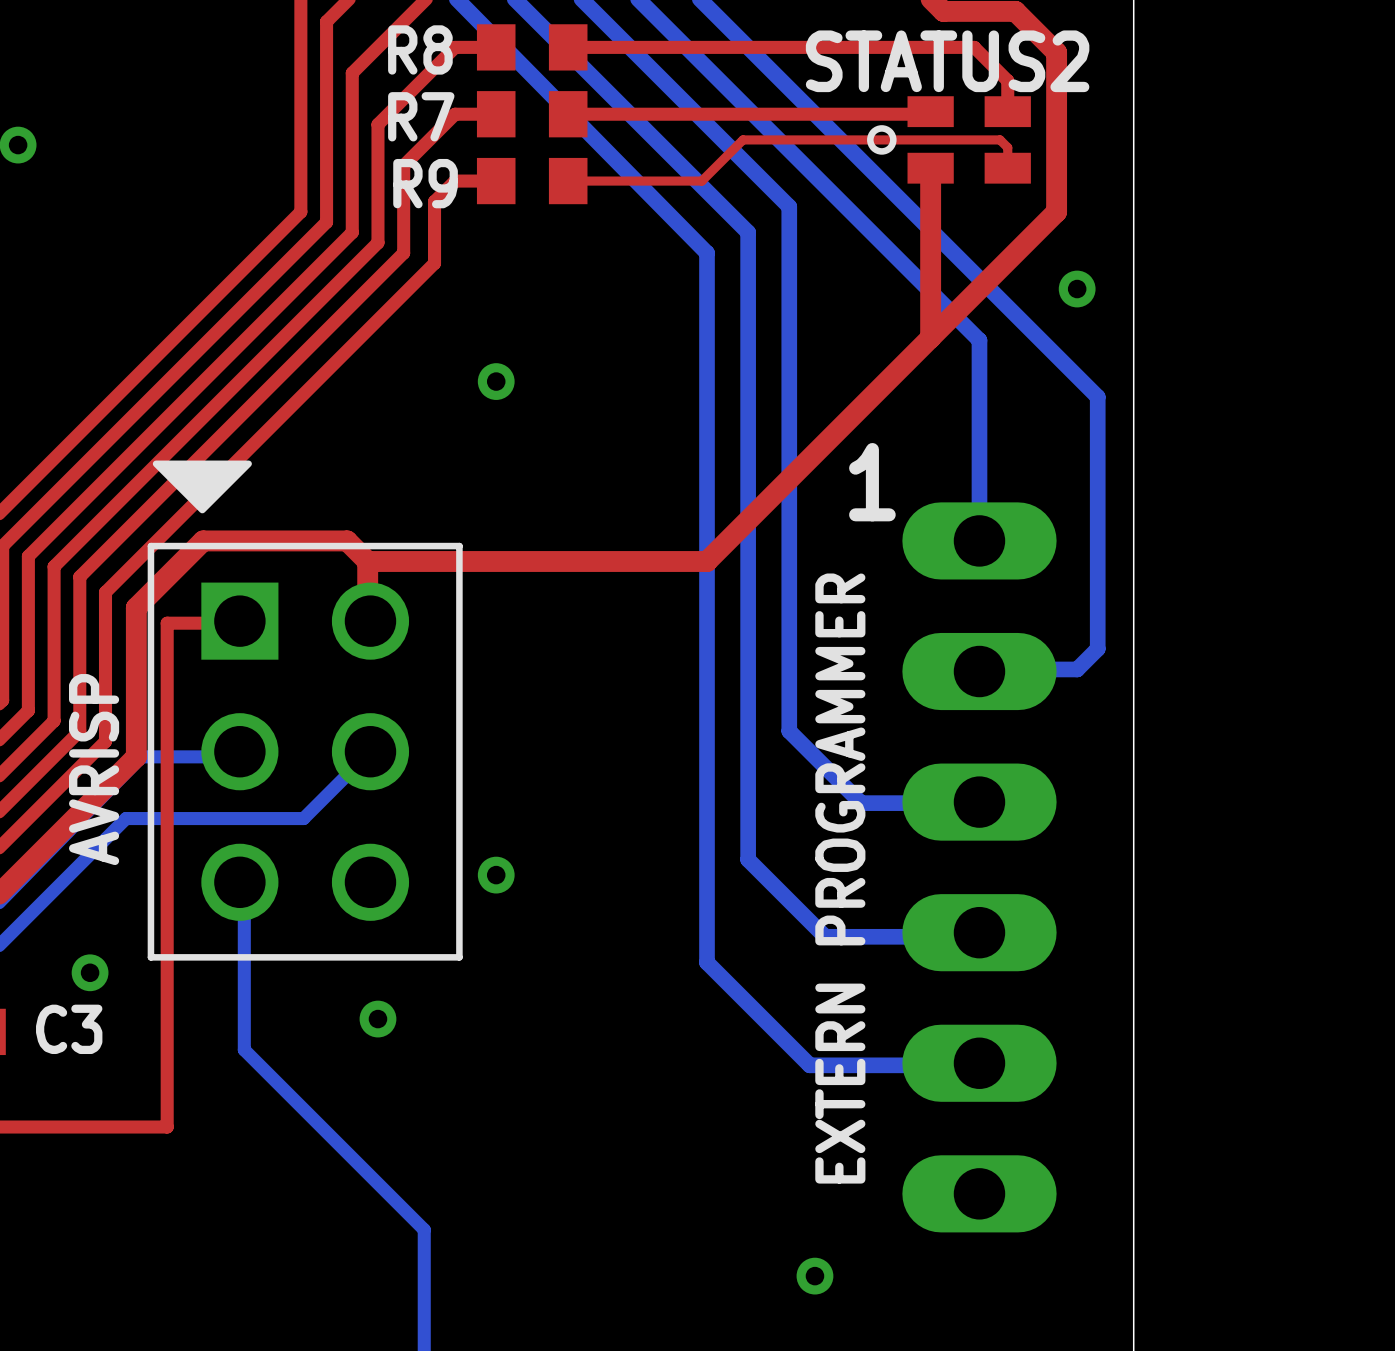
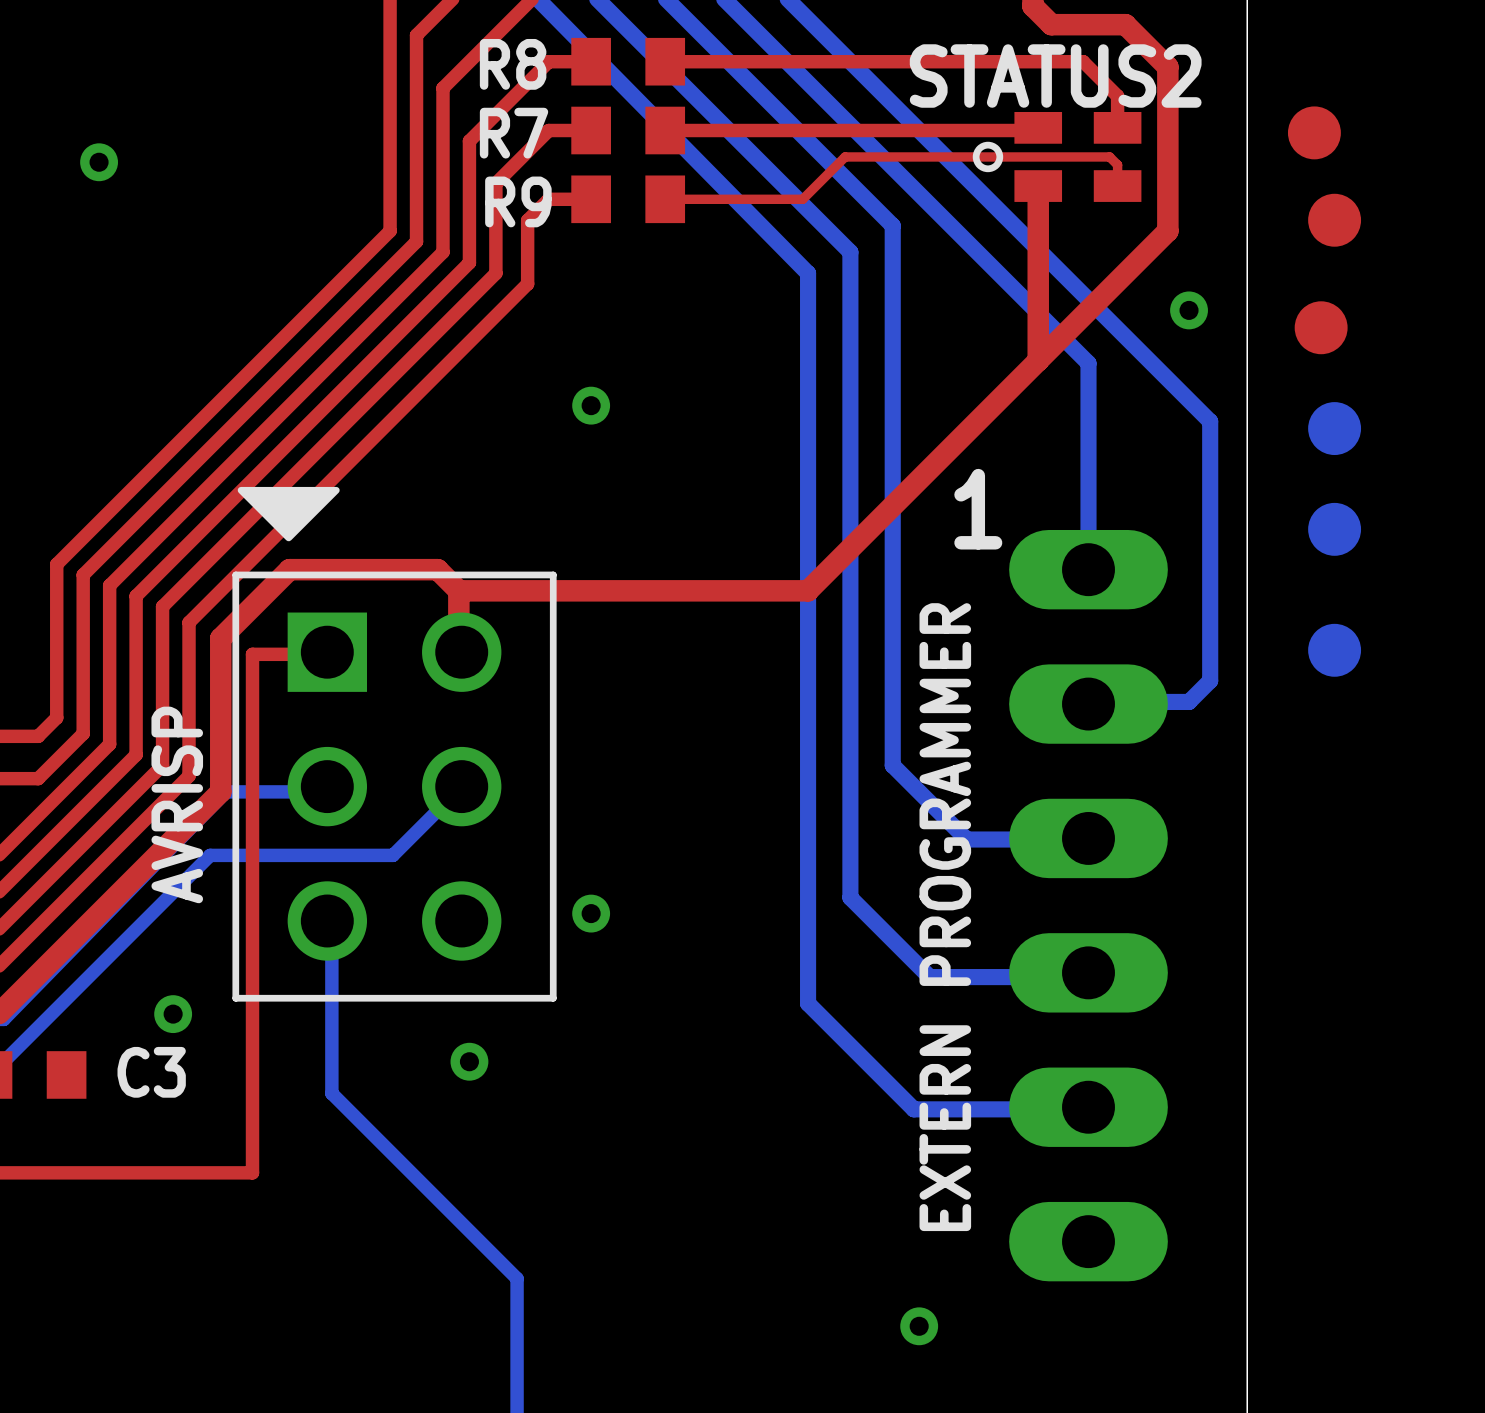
part: none -> (1314, 132)
part: none -> (1334, 220)
part: none -> (1321, 327)
part: none -> (1334, 428)
part: none -> (1334, 529)
part: none -> (1334, 650)

